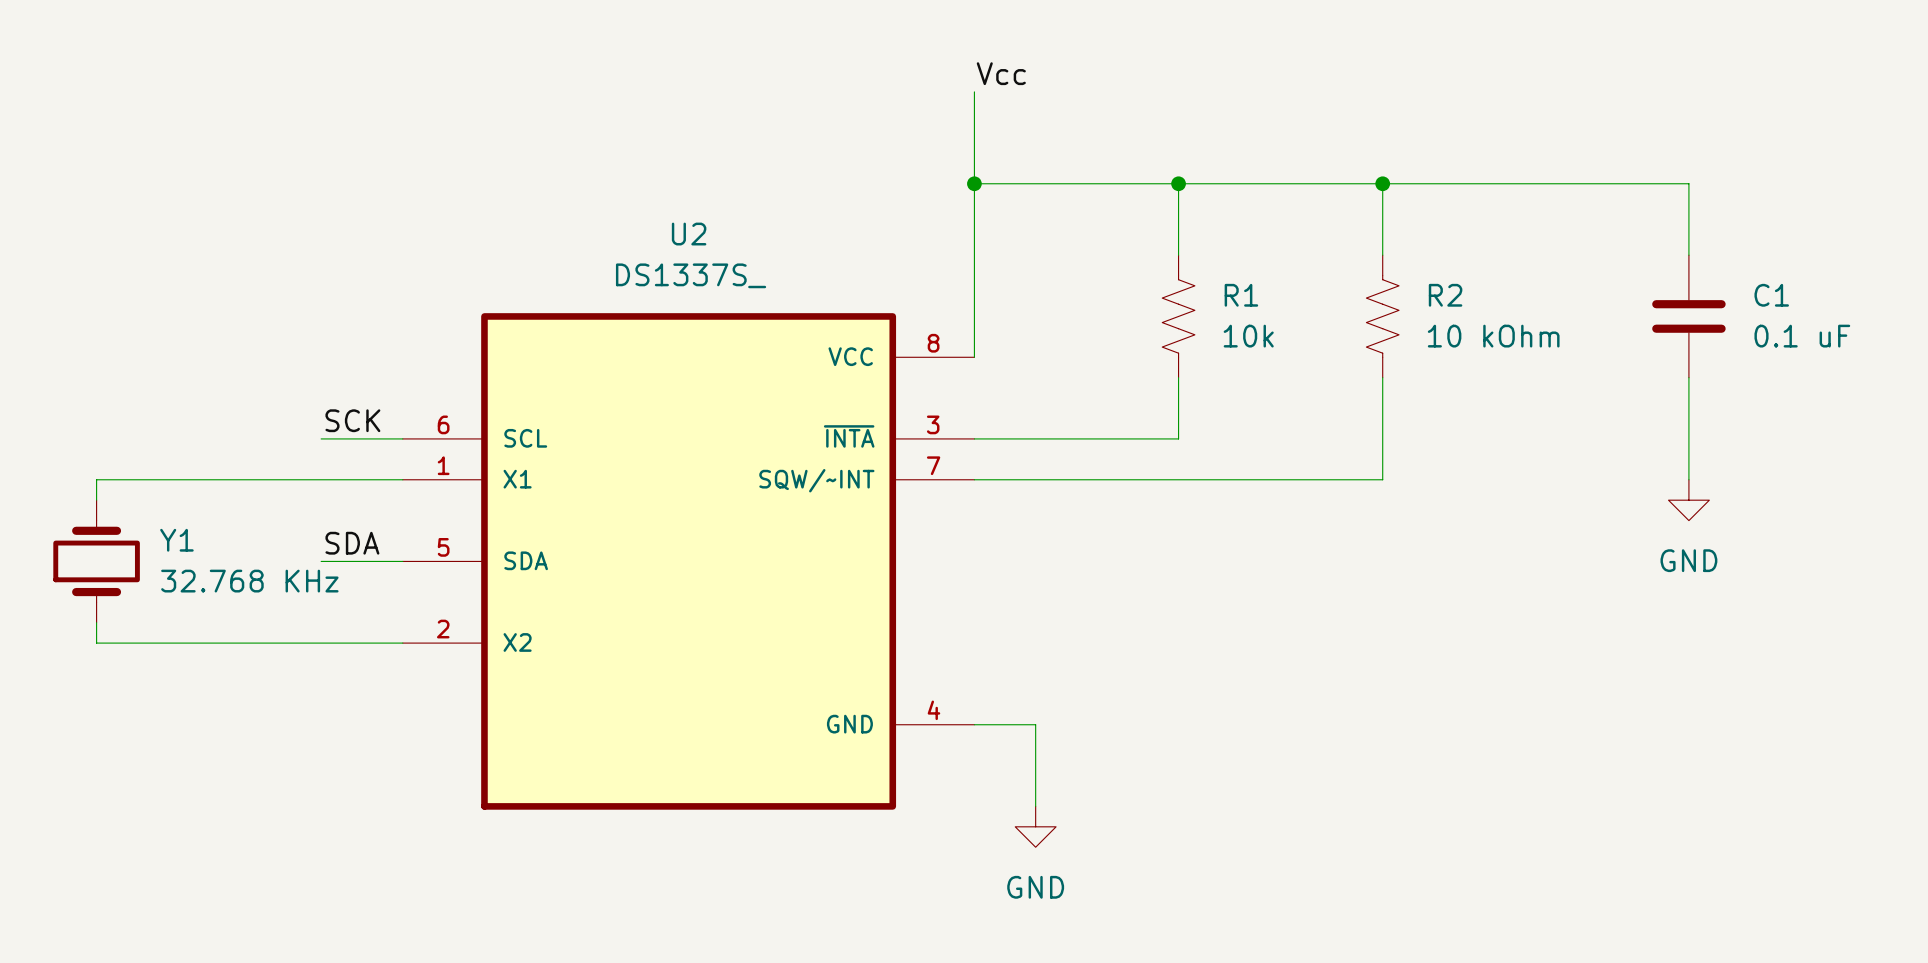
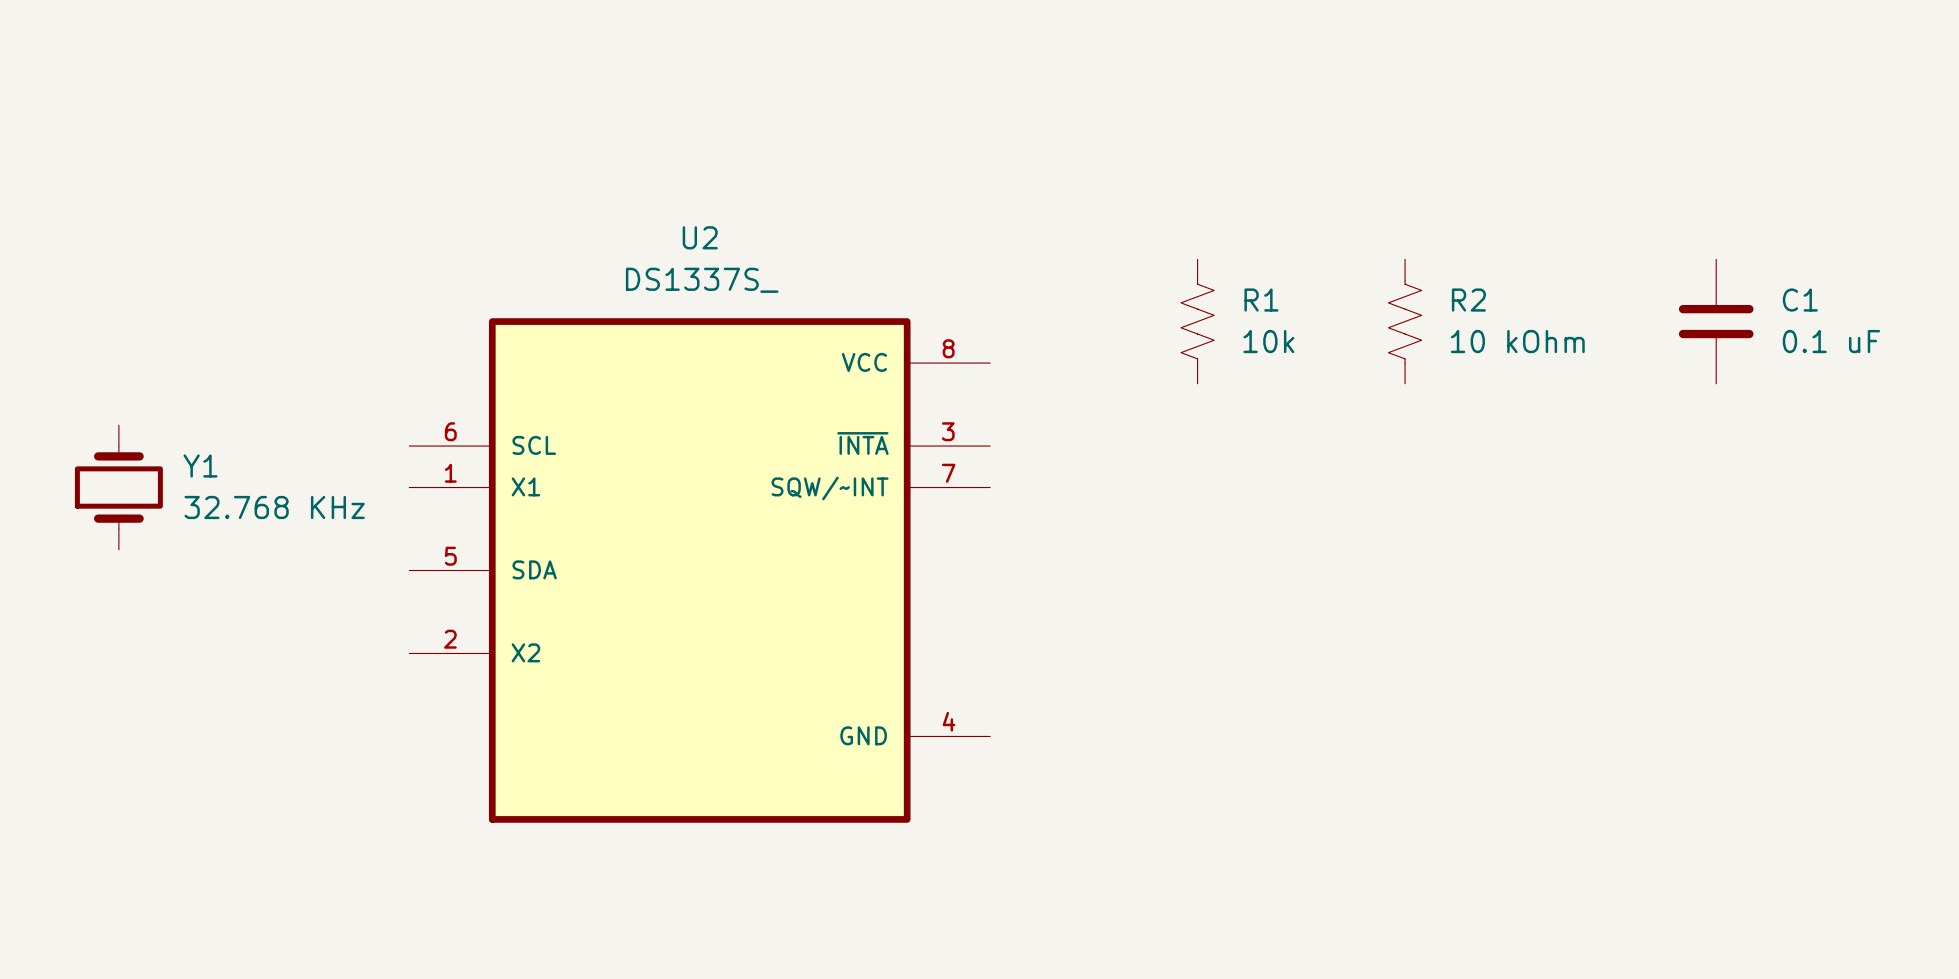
label: Vcc (1001, 73) -> none
wire: (974, 91) (974, 357) -> none
wire: (974, 183) (1688, 183) (1688, 255) -> none
junction: (974, 183) -> none
wire: (1178, 183) (1178, 255) -> none
junction: (1178, 183) -> none
wire: (1382, 183) (1382, 255) -> none
junction: (1382, 183) -> none
wire: (1178, 377) (1178, 438) (974, 438) -> none
wire: (1382, 377) (1382, 479) (974, 479) -> none
wire: (1688, 377) (1688, 479) -> none
label: SCK (352, 420) -> none
wire: (321, 438) (402, 438) -> none
wire: (402, 479) (96, 479) (96, 500) -> none
power symbol: GND (1688, 500) -> none
label: SDA (352, 543) -> none
Y1 position: (96, 561) -> (118, 487)
wire: (321, 561) (402, 561) -> none
wire: (96, 622) (96, 643) (402, 643) -> none
wire: (974, 724) (1035, 724) (1035, 806) -> none
power symbol: GND (1035, 826) -> none

